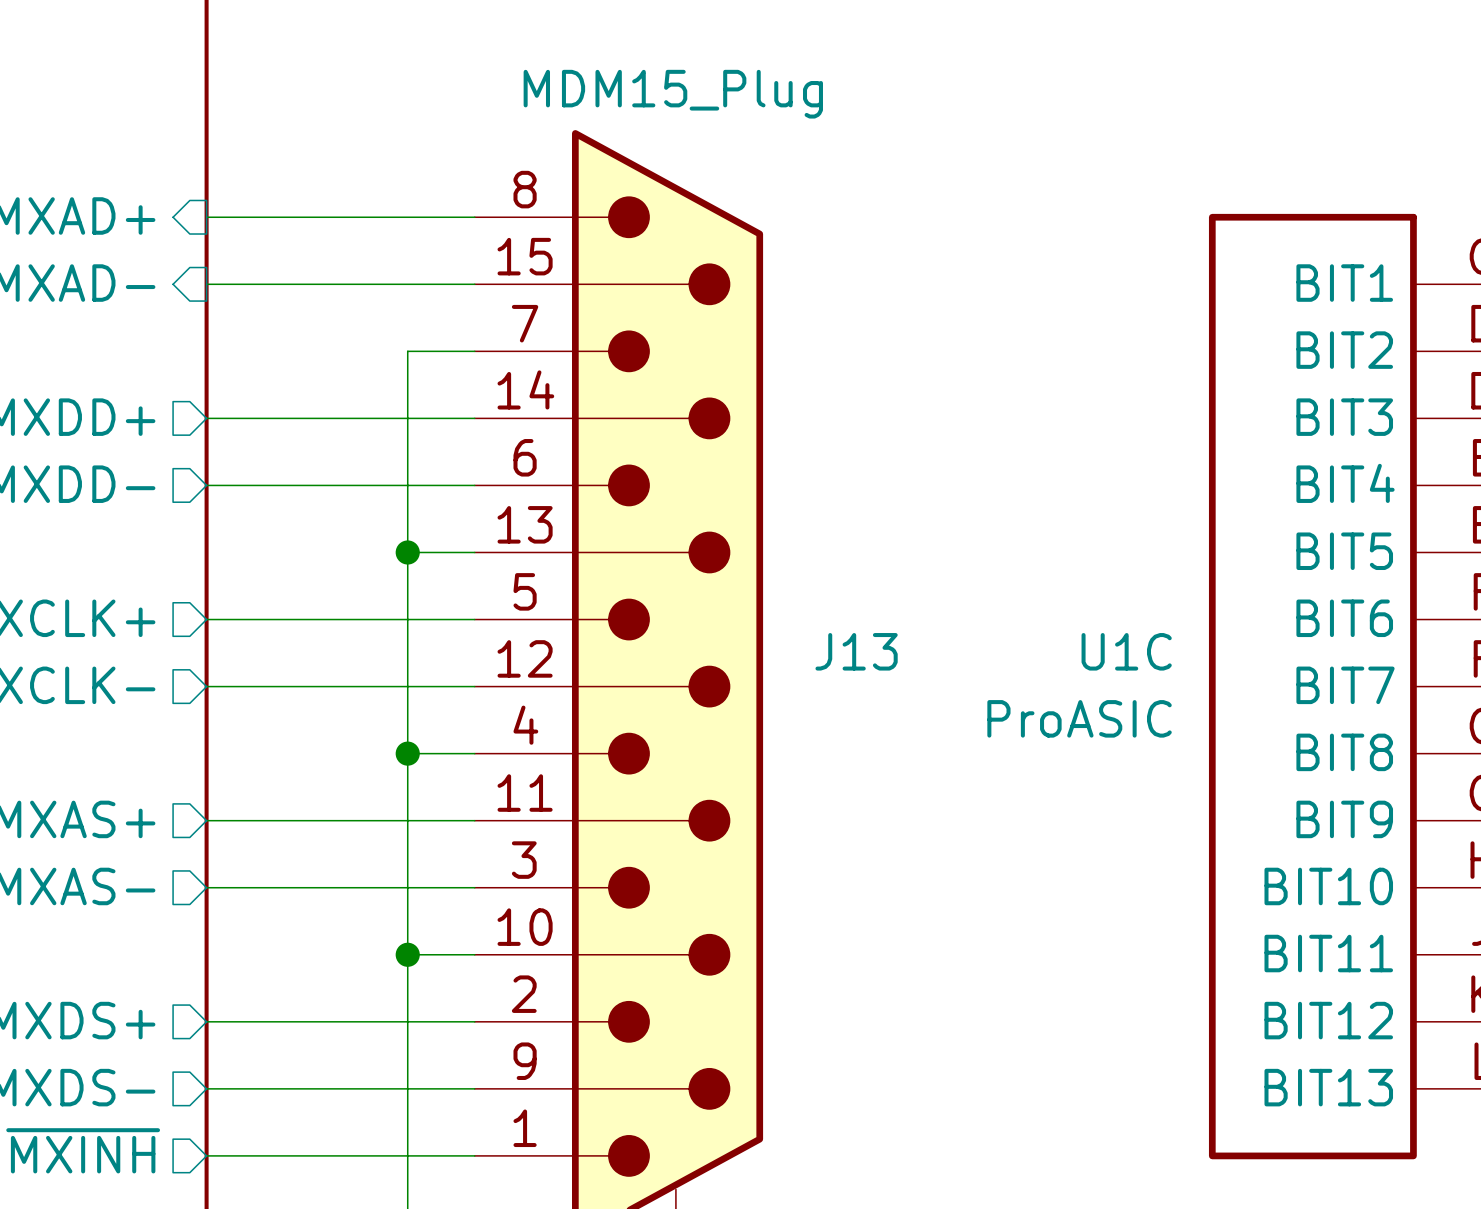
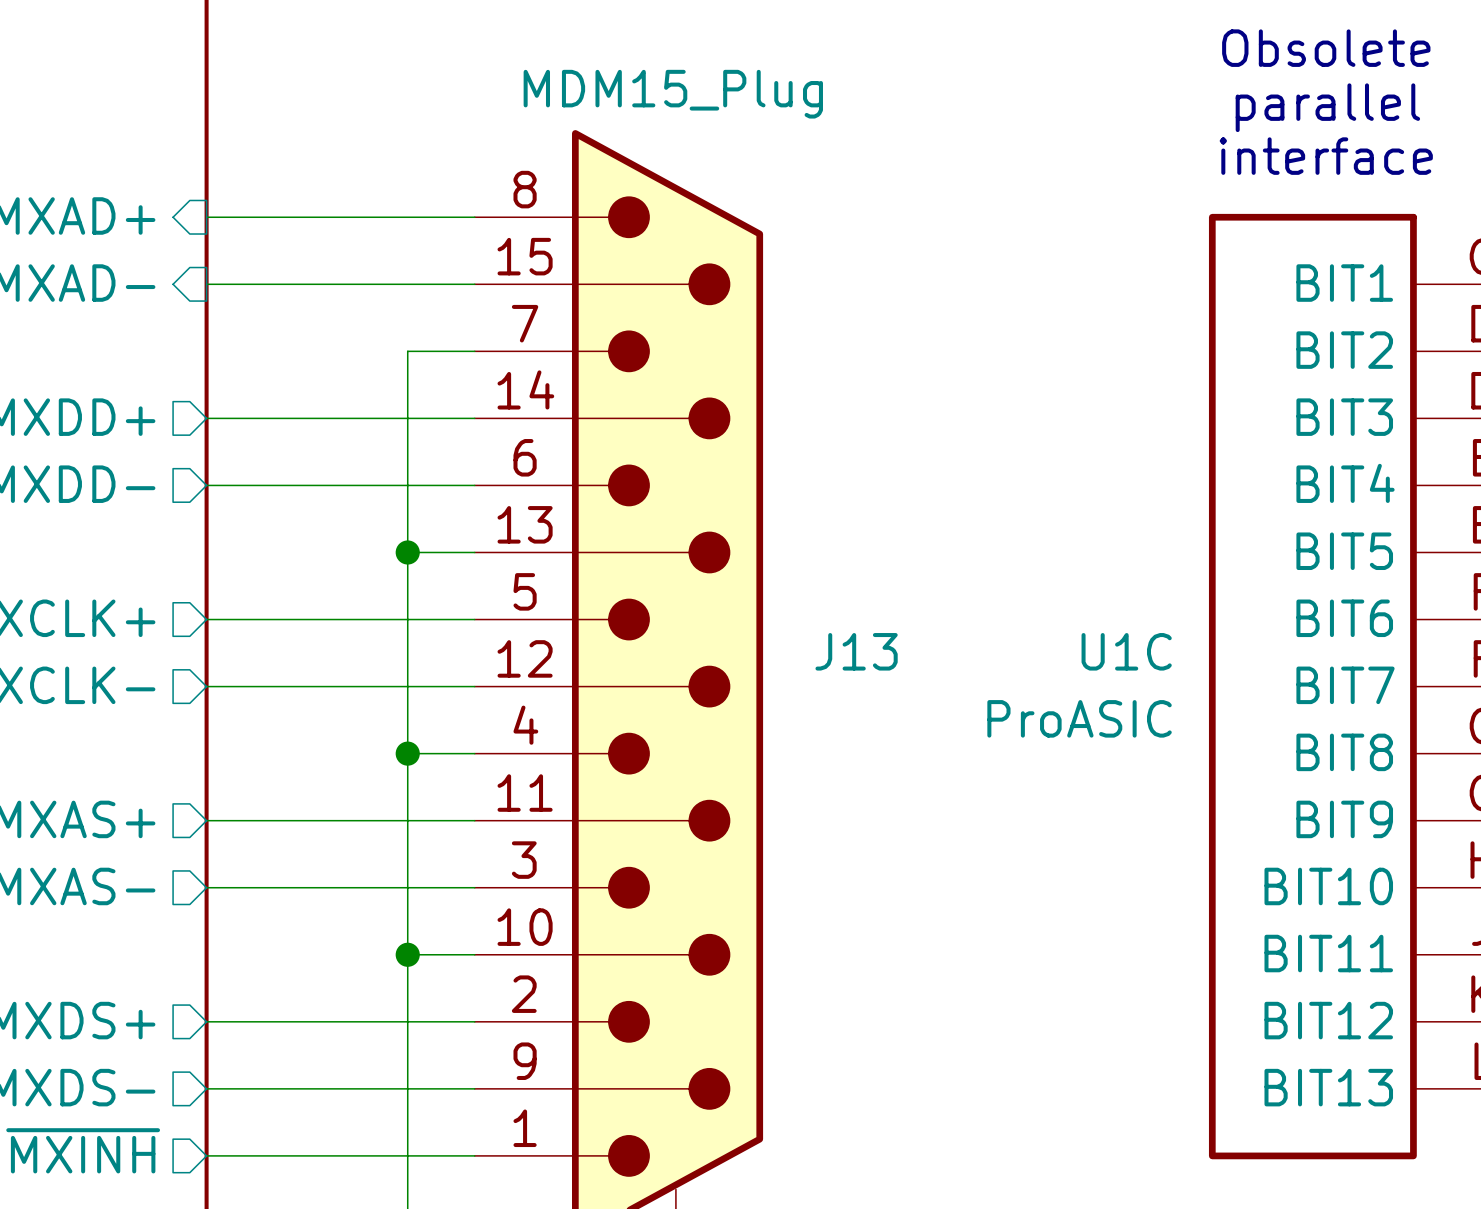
text: none -> Obsolete (1326, 48)
text: none -> parallel (1327, 107)
text: none -> interface (1326, 156)

